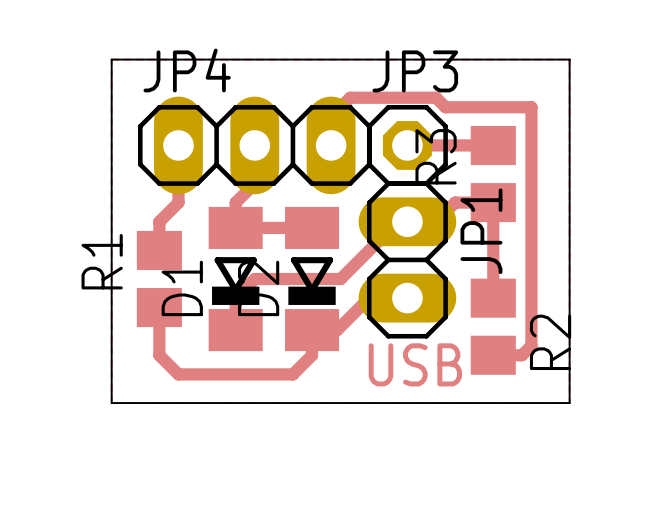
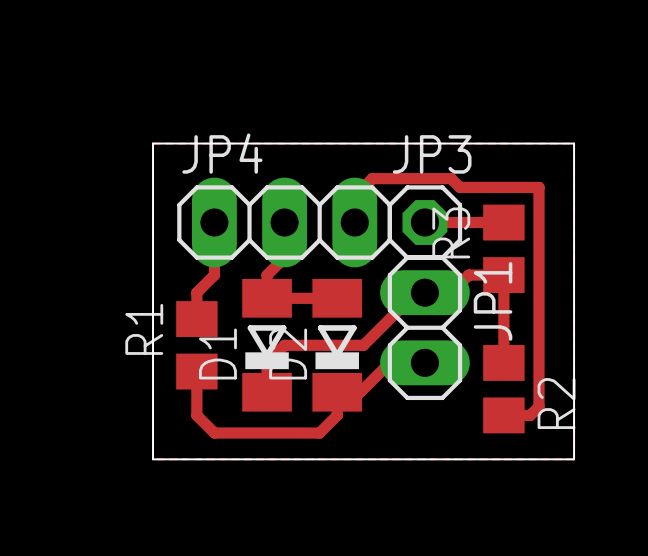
text: USB (415, 364) -> none

